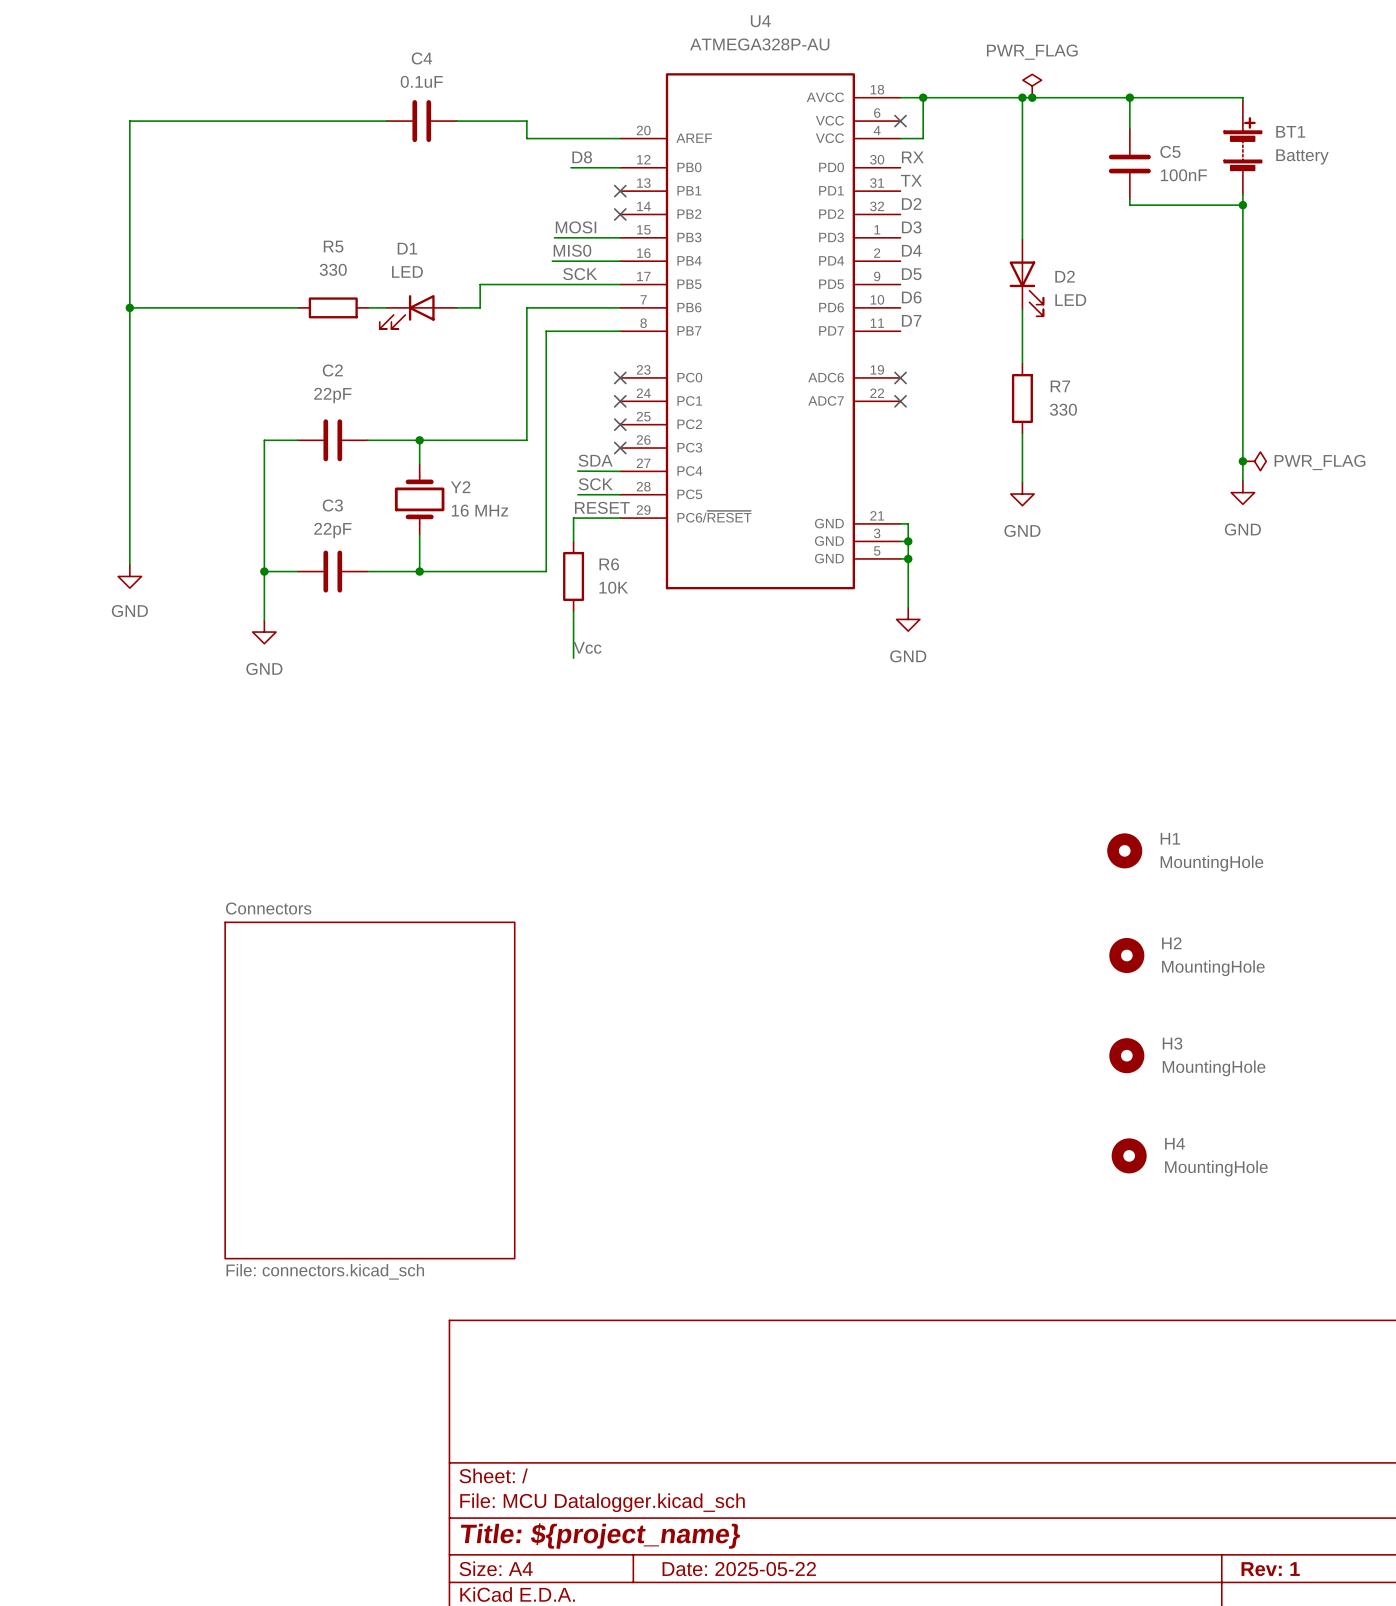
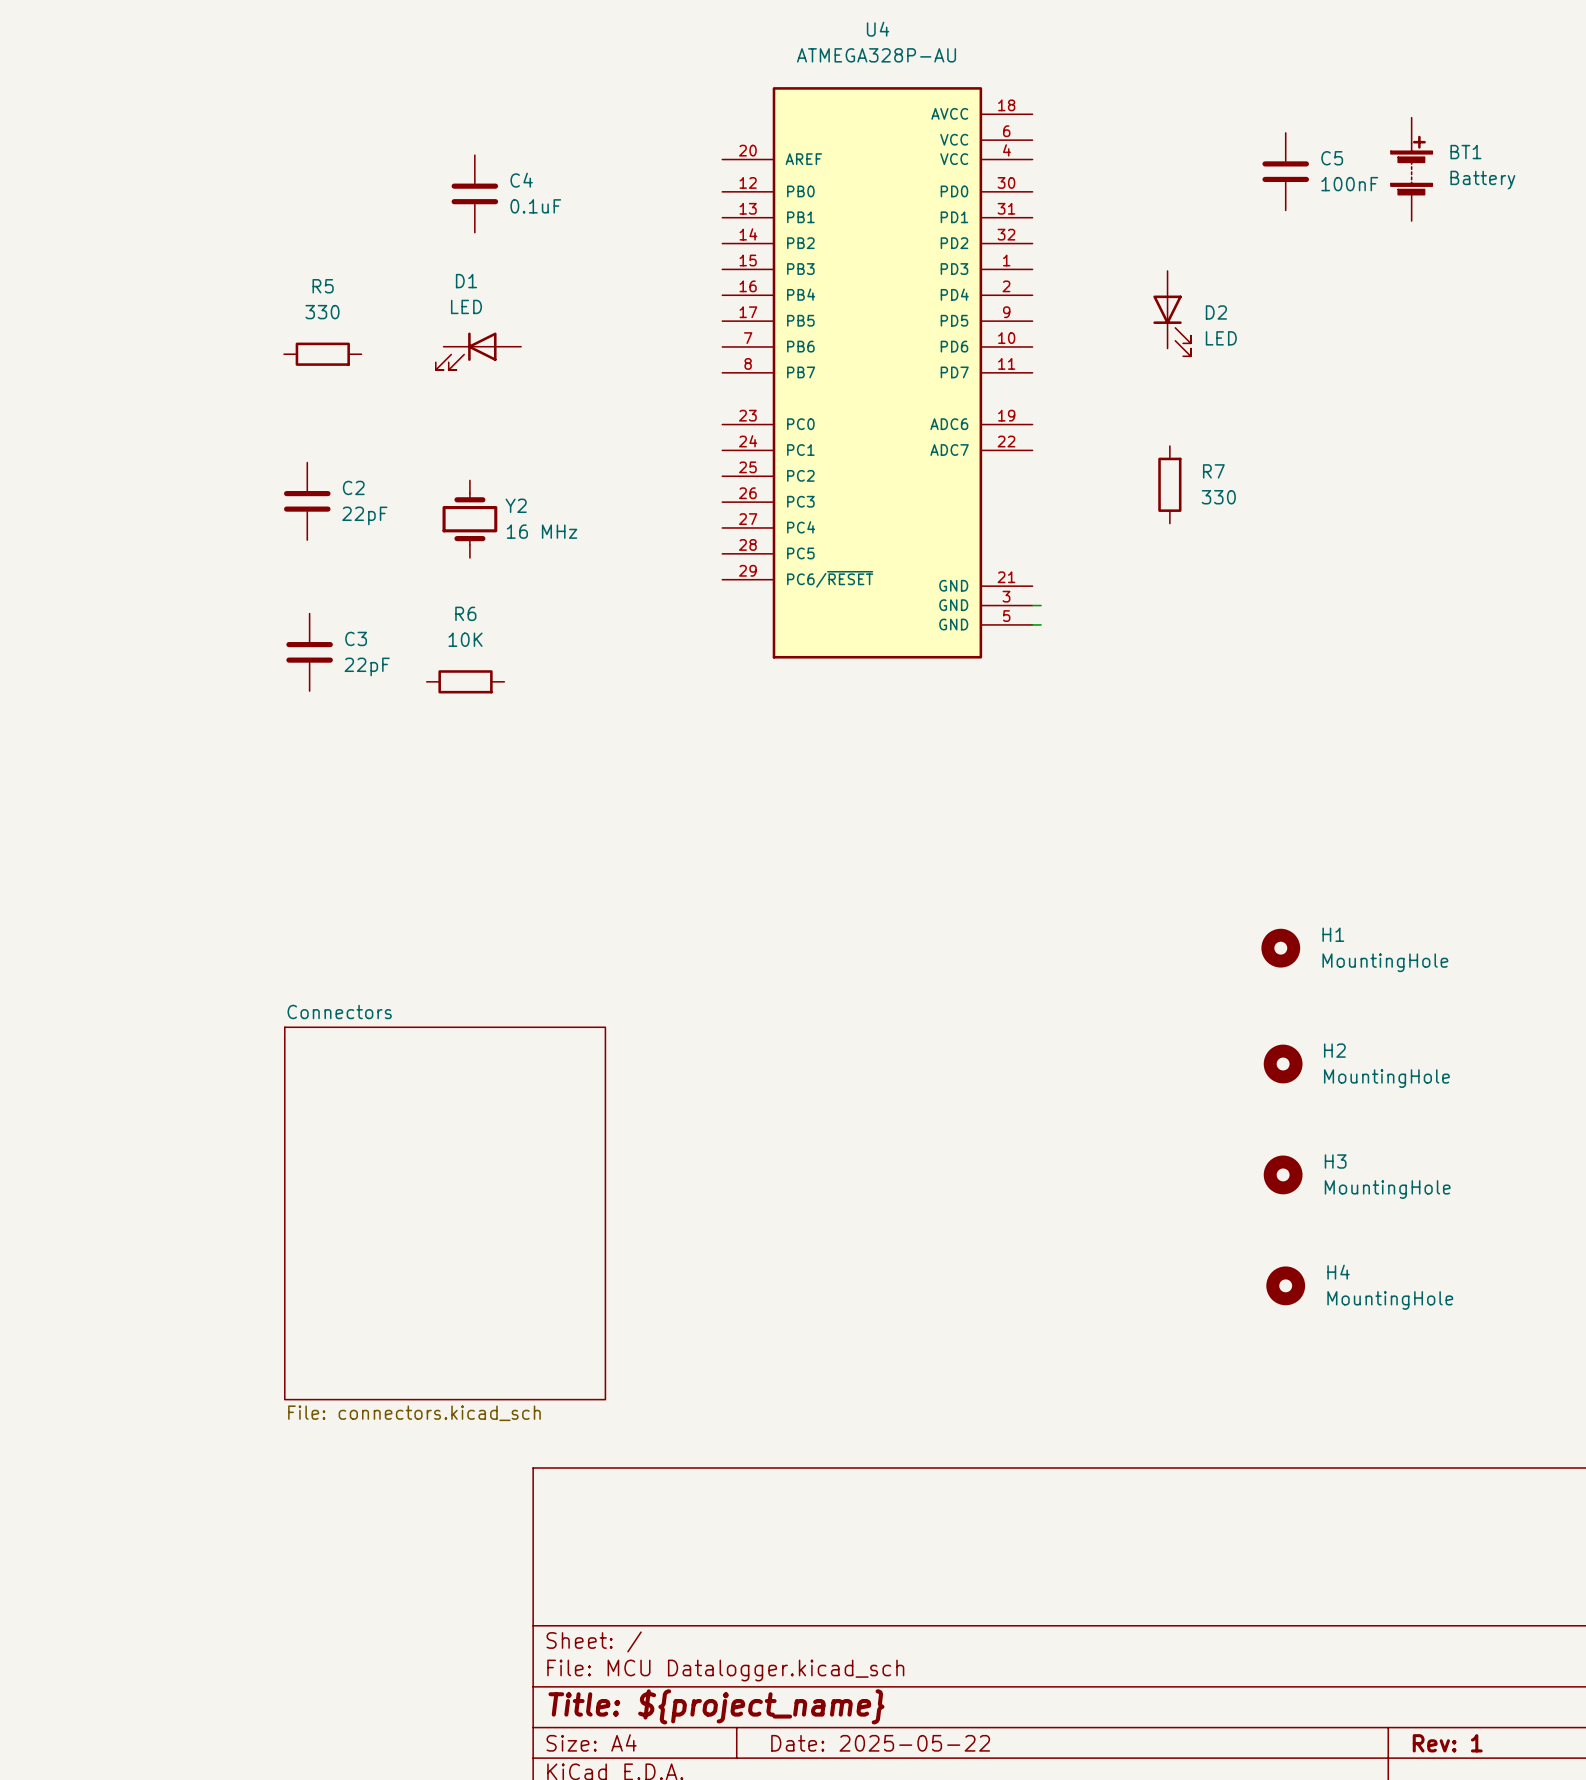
C4 name position: C4 (421, 58) -> C4 (521, 180)
C4 value position: 0.1uF (421, 81) -> 0.1uF (535, 206)
power symbol: PWR_FLAG (1032, 86) -> none
wire: (900, 97) (1242, 97) (1242, 100) -> none
wire: (923, 97) (923, 138) (900, 138) -> none
junction: (923, 97) -> none
wire: (1022, 97) (1022, 239) -> none
junction: (1022, 97) -> none
junction: (1032, 97) -> none
wire: (1129, 97) (1129, 129) -> none
junction: (1129, 97) -> none
wire: (386, 121) (129, 121) (129, 564) -> none
C4 rotation: 0° (421, 121) -> 90° clockwise (474, 193)
C4 position: (421, 121) -> (474, 193)
wire: (456, 121) (526, 121) (526, 138) (620, 138) -> none
no-connect mark: (900, 121) -> none
label: D8 (582, 157) -> none
label: RX (912, 157) -> none
C5 position: (1129, 164) -> (1285, 171)
wire: (571, 167) (620, 167) -> none
label: TX (911, 180) -> none
no-connect mark: (620, 191) -> none
wire: (1242, 194) (1242, 480) -> none
wire: (1129, 199) (1129, 205) (1242, 205) -> none
label: D2 (911, 203) -> none
junction: (1242, 205) -> none
no-connect mark: (620, 214) -> none
label: MOSI (576, 227) -> none
label: D3 (911, 227) -> none
wire: (554, 237) (620, 237) -> none
label: MIS0 (572, 250) -> none
label: D4 (911, 250) -> none
wire: (552, 261) (620, 261) -> none
label: SCK (580, 274) -> none
label: D5 (911, 274) -> none
wire: (620, 284) (480, 284) (480, 307) (456, 307) -> none
label: D6 (911, 297) -> none
wire: (129, 307) (298, 307) -> none
junction: (129, 307) -> none
R5 position: (333, 307) -> (322, 354)
wire: (620, 307) (526, 307) (526, 440) (367, 440) -> none
wire: (1022, 309) (1022, 363) -> none
D1 position: (418, 311) -> (478, 351)
label: D7 (911, 320) -> none
wire: (620, 331) (546, 331) (546, 571) (367, 571) -> none
C2 name position: C2 (332, 370) -> C2 (353, 487)
no-connect mark: (620, 377) -> none
no-connect mark: (900, 377) -> none
R7 position: (1022, 398) -> (1169, 484)
no-connect mark: (620, 401) -> none
no-connect mark: (900, 401) -> none
no-connect mark: (620, 424) -> none
wire: (1022, 433) (1022, 482) -> none
wire: (297, 440) (264, 440) (264, 620) -> none
C2 rotation: 0° (332, 440) -> 90° clockwise (307, 501)
C2 position: (332, 440) -> (307, 501)
wire: (419, 440) (419, 464) -> none
junction: (419, 440) -> none
no-connect mark: (620, 448) -> none
label: SDA (595, 460) -> none
junction: (1242, 461) -> none
power symbol: PWR_FLAG (1254, 461) -> none
wire: (577, 471) (620, 471) -> none
label: SCK (595, 484) -> none
power symbol: GND (1242, 492) -> none
wire: (578, 494) (620, 494) -> none
power symbol: GND (1022, 494) -> none
Y2 position: (419, 499) -> (469, 519)
C3 name position: C3 (332, 505) -> C3 (356, 638)
label: RESET (602, 507) -> none
wire: (620, 518) (573, 518) (573, 541) -> none
wire: (900, 523) (908, 523) (908, 607) -> none
wire: (419, 534) (419, 571) -> none
junction: (908, 541) -> none
junction: (908, 558) -> none
R6 name position: R6 (609, 564) -> R6 (465, 613)
wire: (264, 571) (297, 571) -> none
junction: (264, 571) -> none
C3 rotation: 0° (332, 571) -> 90° clockwise (309, 652)
C3 position: (332, 571) -> (309, 652)
junction: (419, 571) -> none
power symbol: GND (129, 576) -> none
R6 rotation: 0° (573, 576) -> 90° clockwise (465, 681)
R6 position: (573, 576) -> (465, 681)
R6 value position: 10K (613, 587) -> 10K (465, 639)
wire: (573, 611) (573, 658) -> none
power symbol: GND (908, 619) -> none
power symbol: GND (264, 632) -> none
label: Vcc (587, 647) -> none

